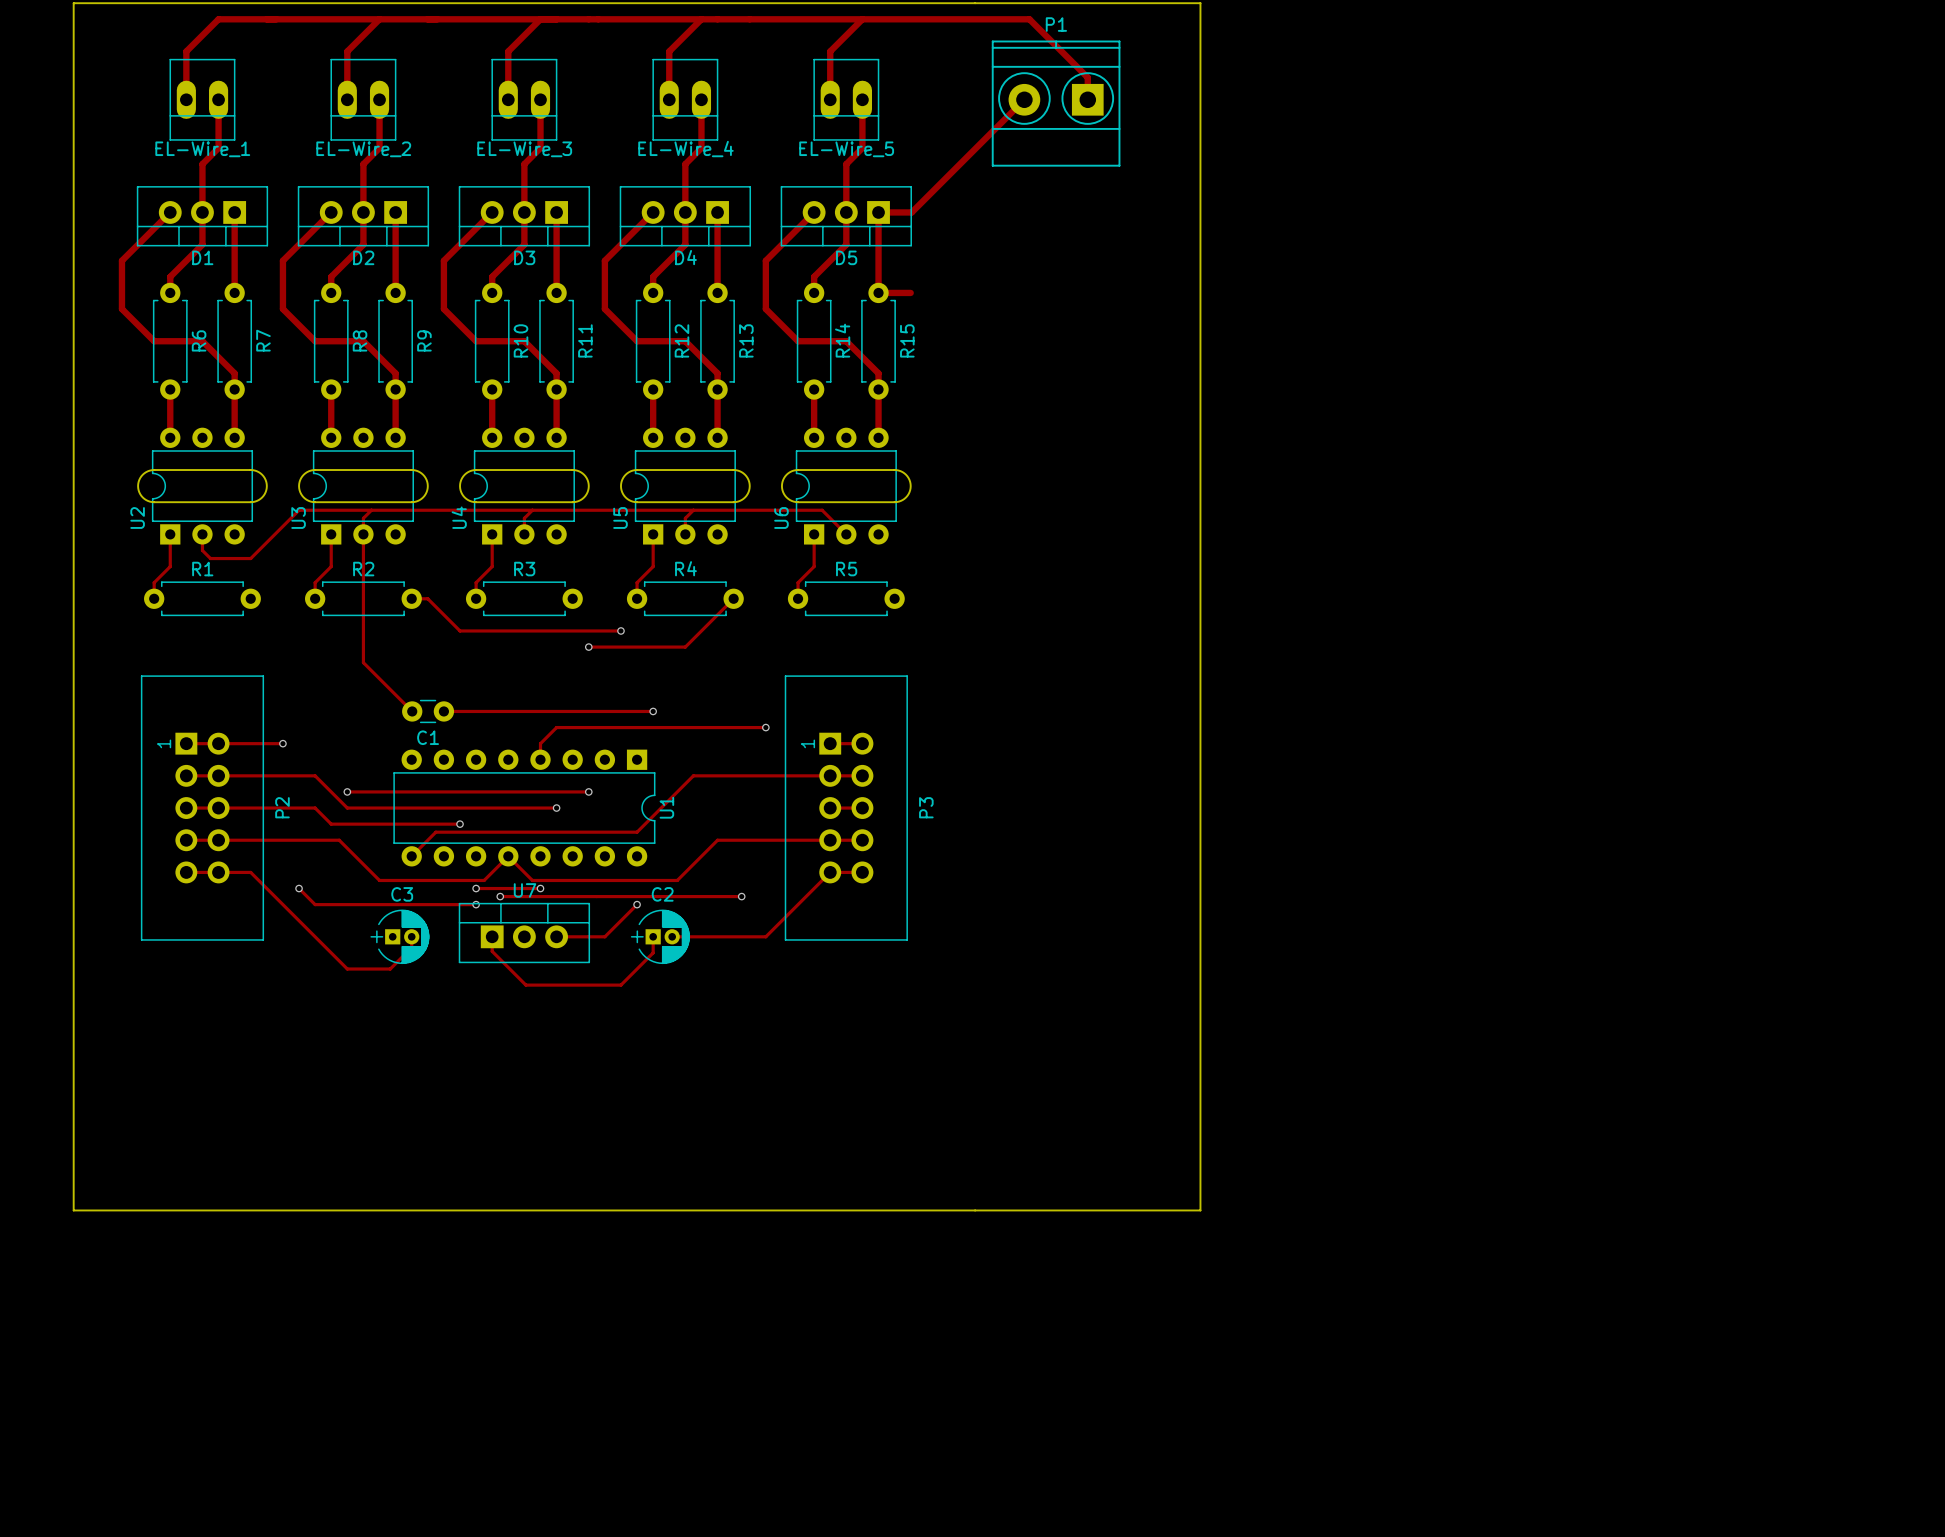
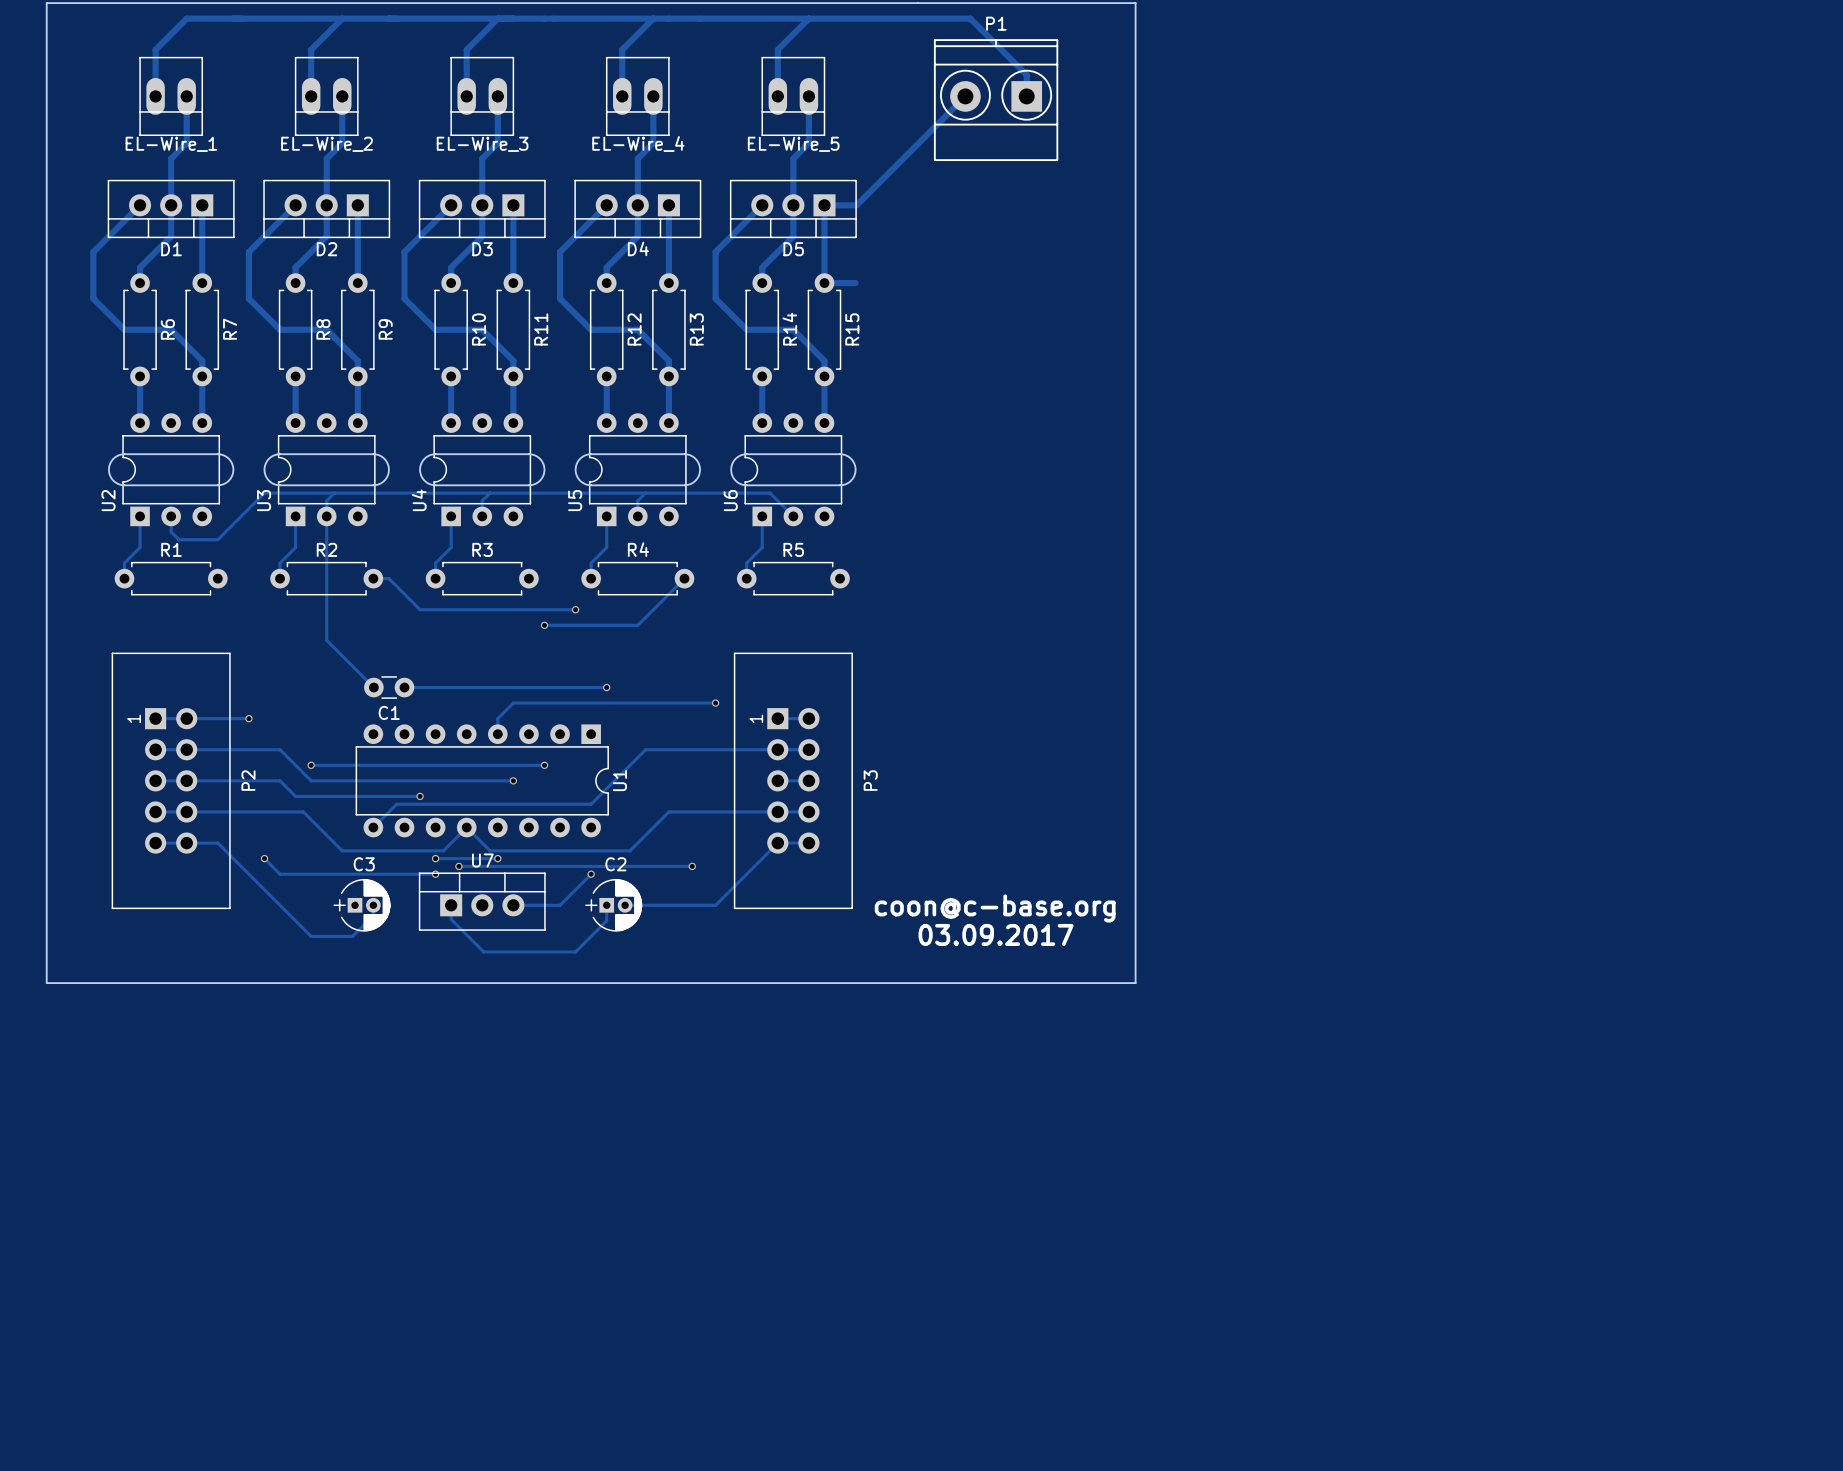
text: none -> coon@c-base.org (995, 908)
text: none -> 03.09.2017 (996, 934)
board edge: (73, 1017) (73, 1210) (1200, 1210) (1200, 1017) -> (46, 983) (1135, 983)

